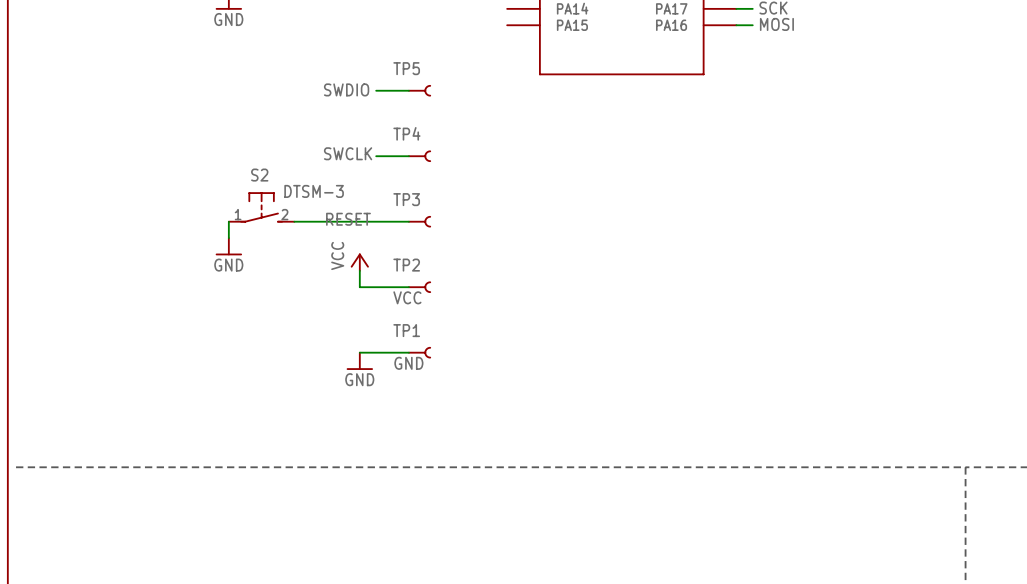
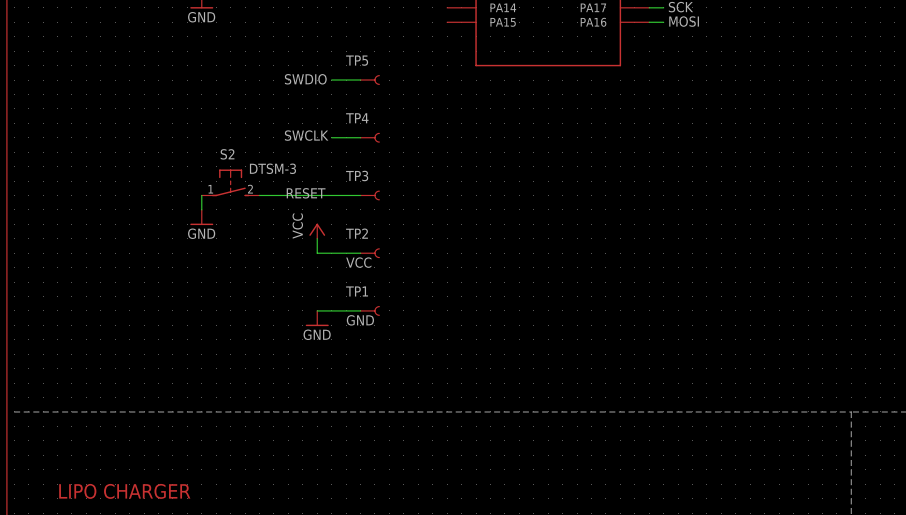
text: none -> LIPO CHARGER (124, 491)

